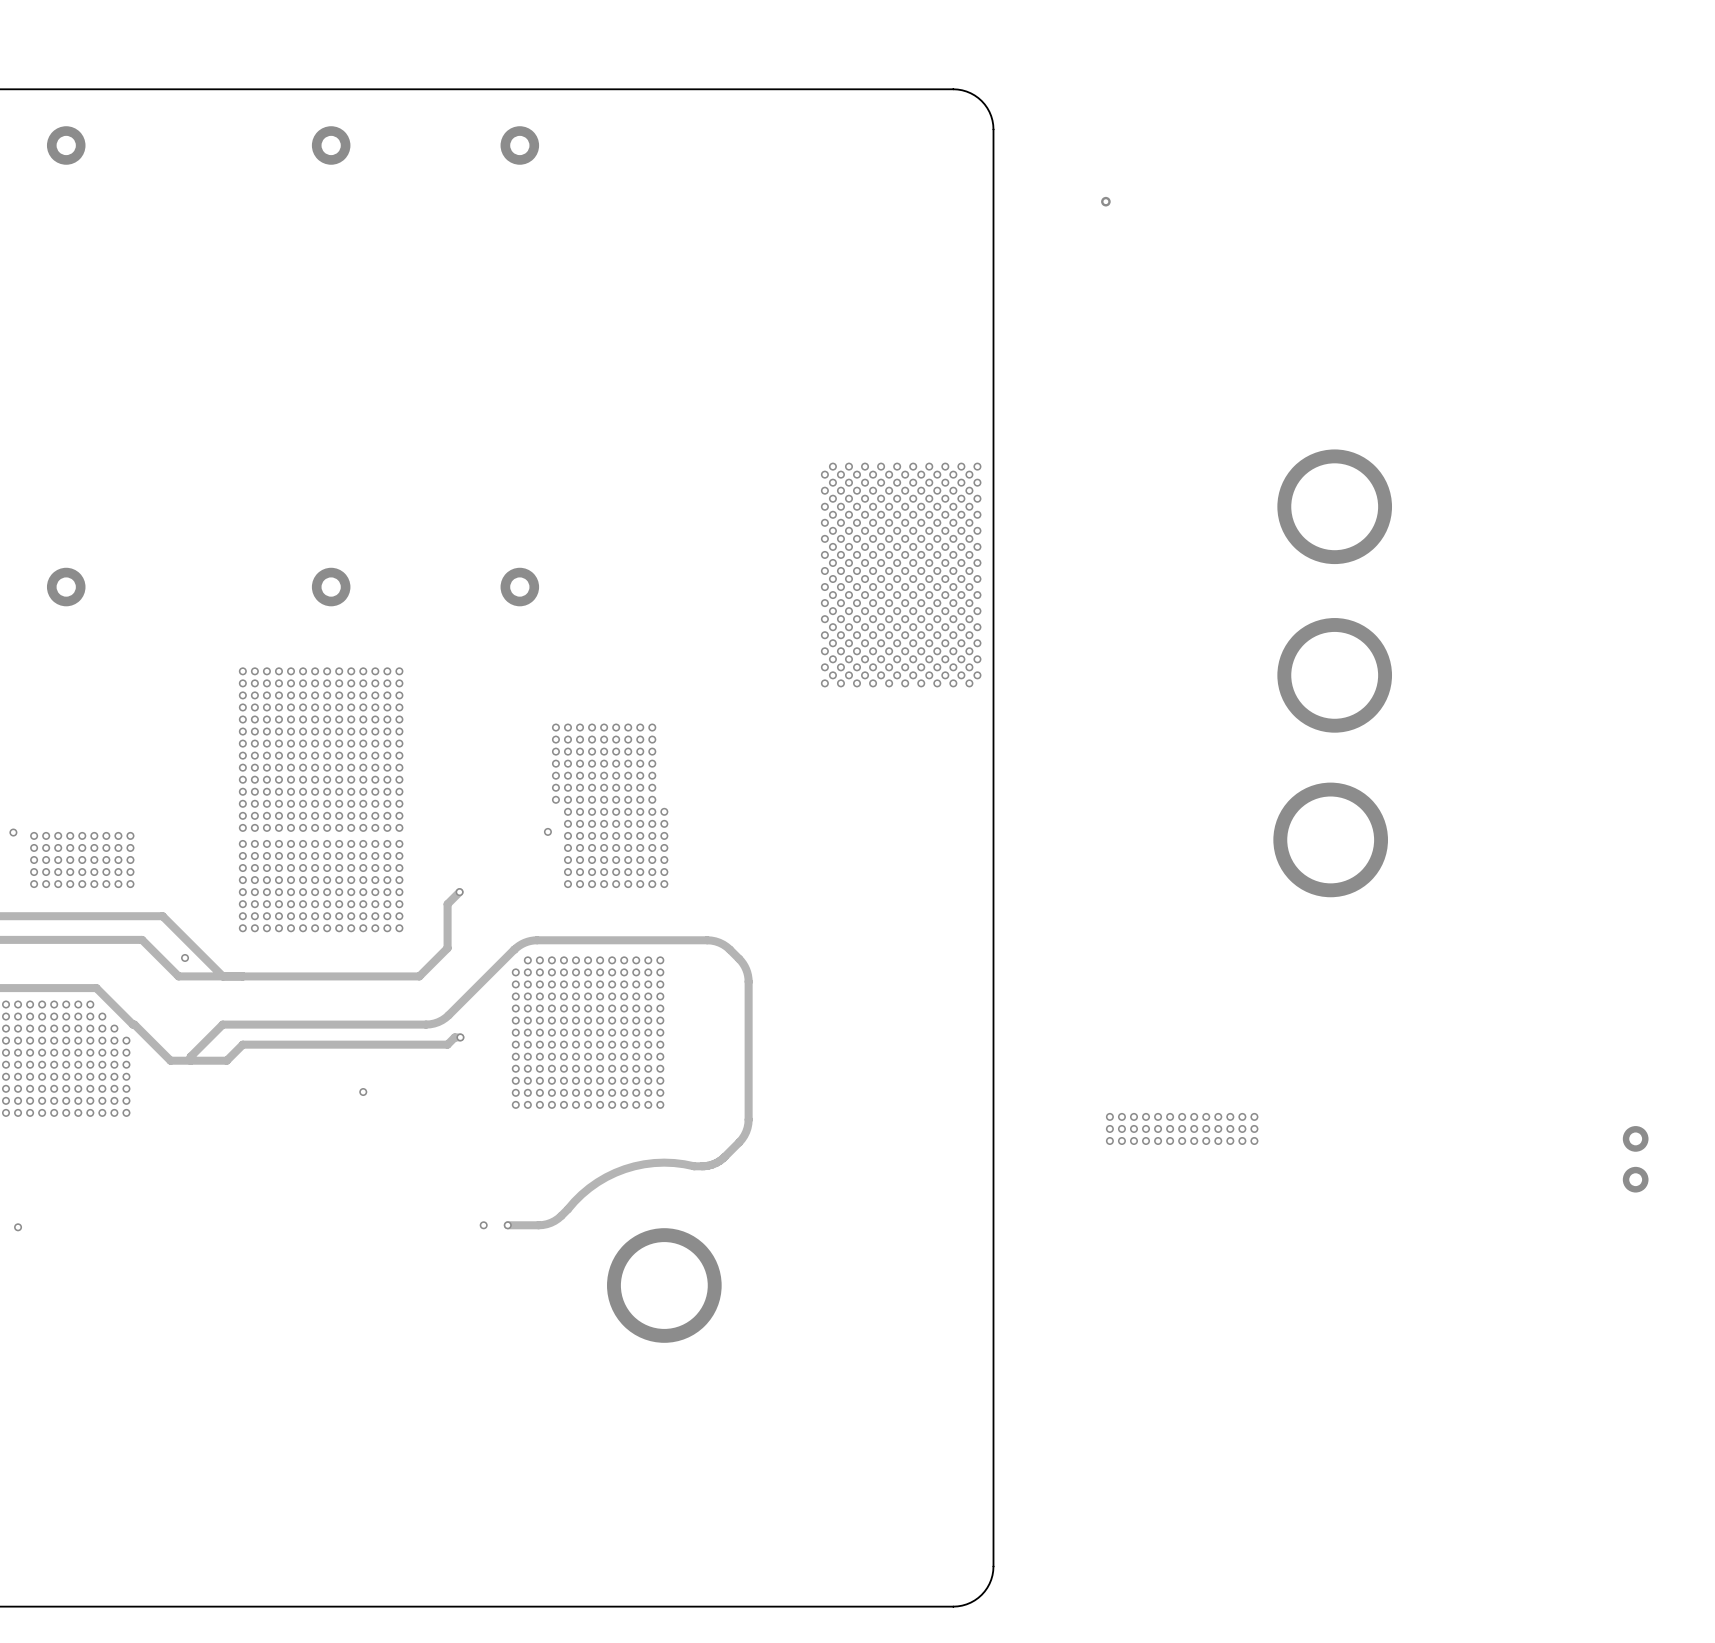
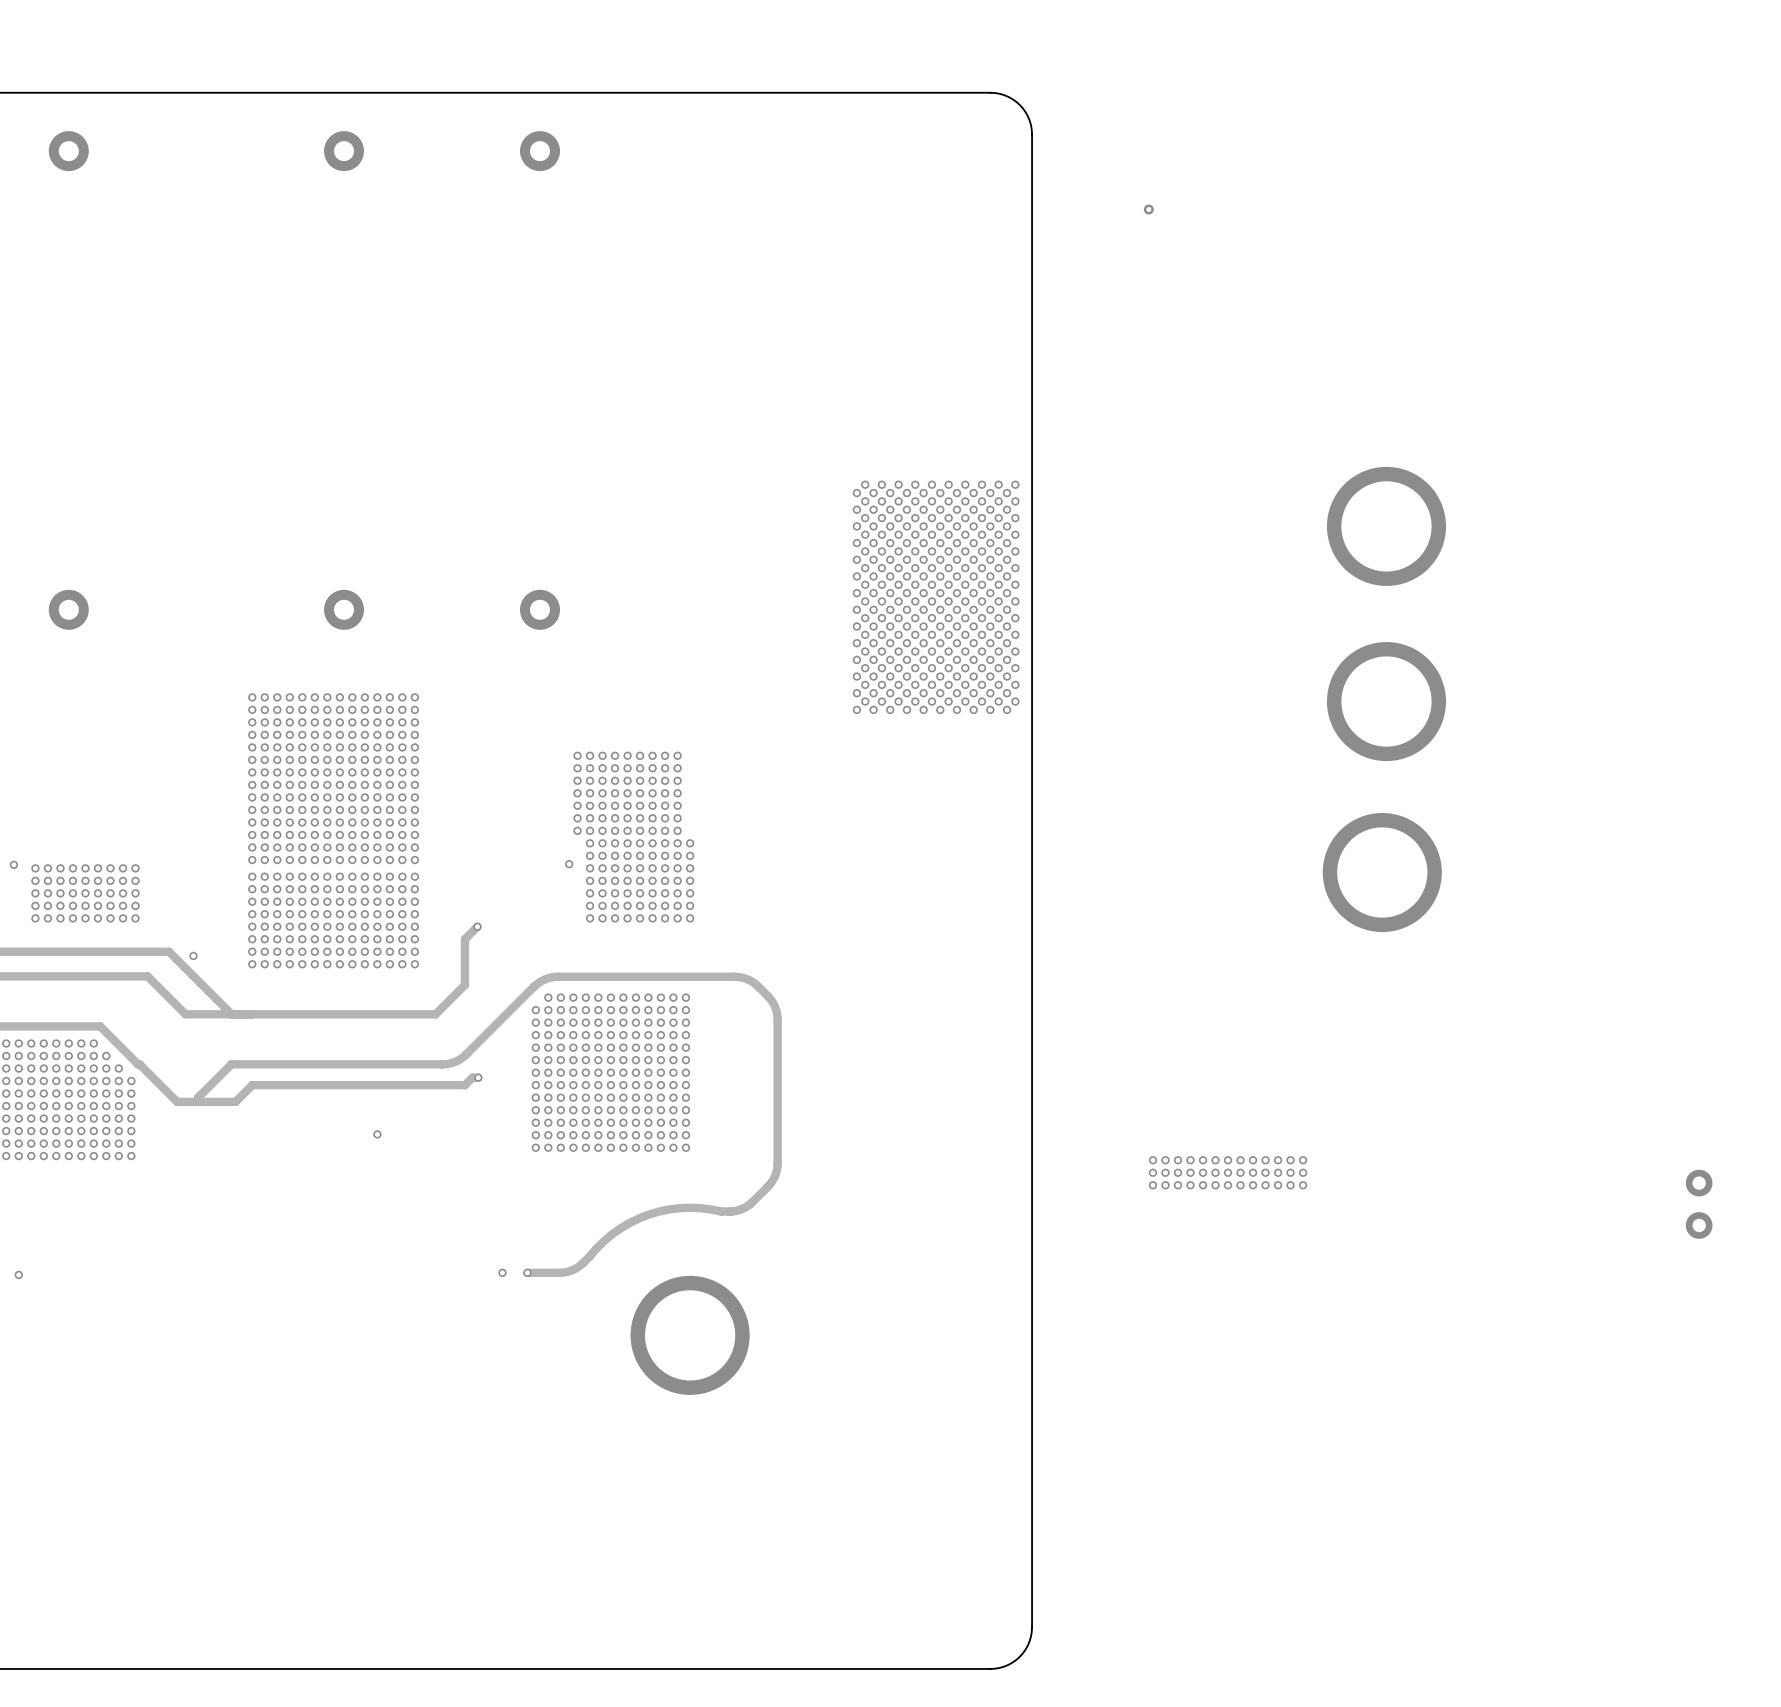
via position: (185, 957) -> (193, 955)

